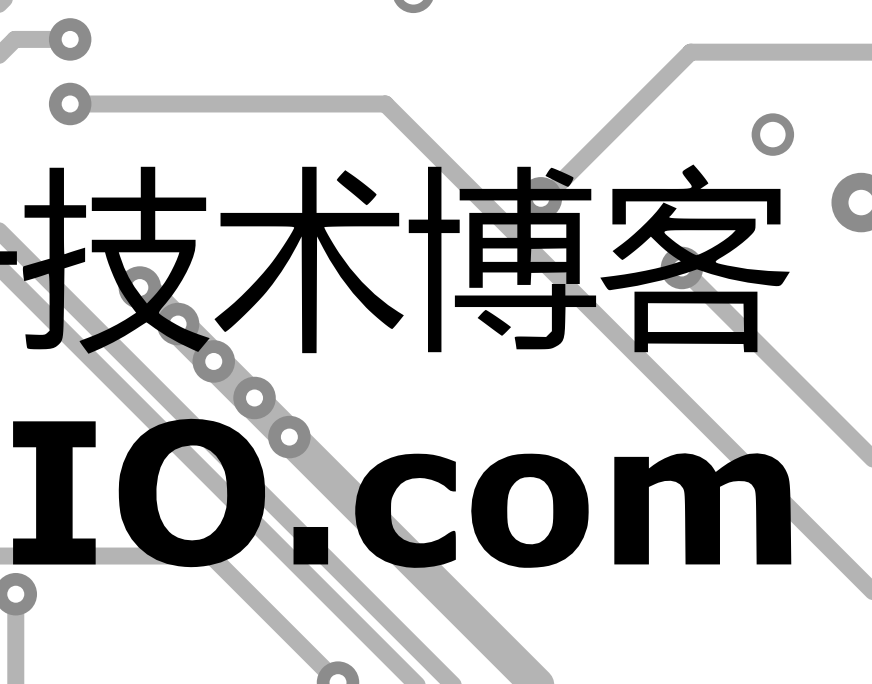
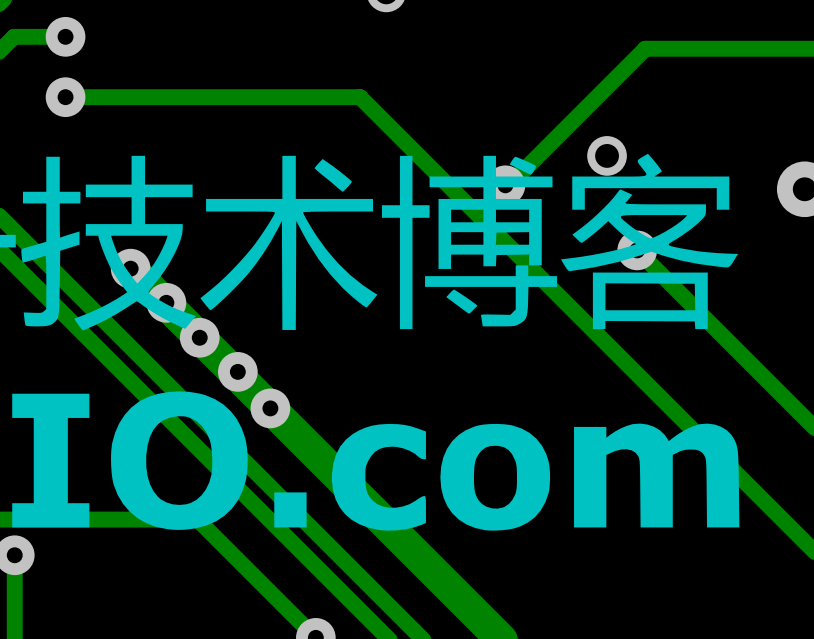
via position: (772, 134) -> (607, 155)

